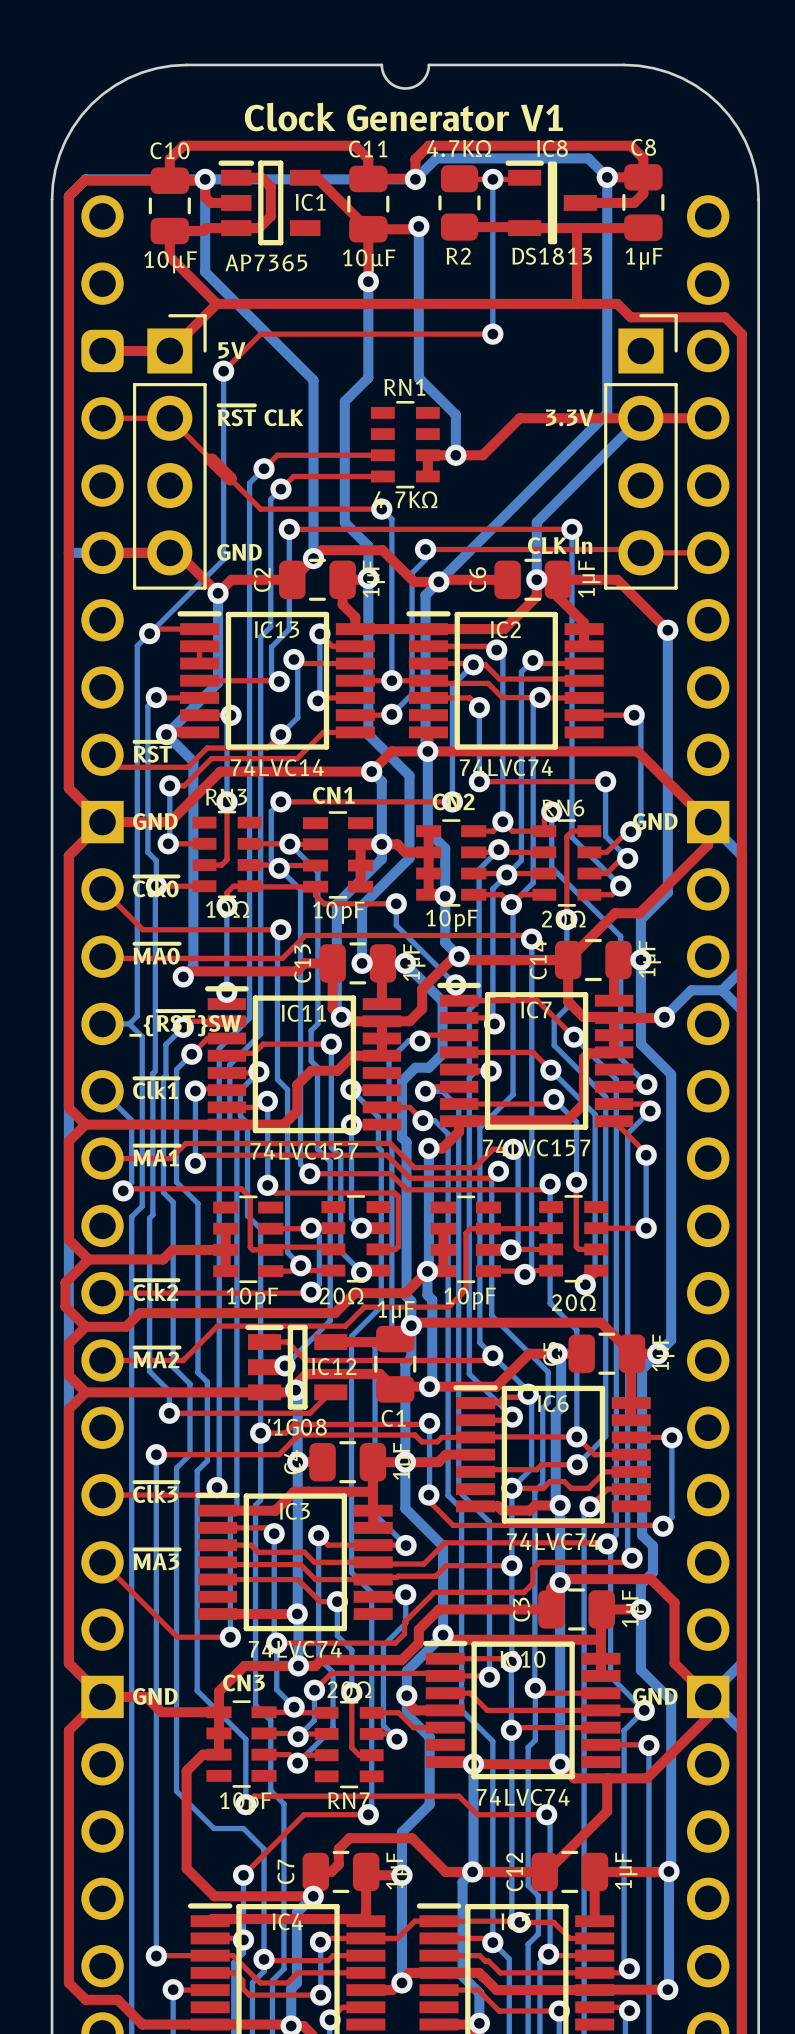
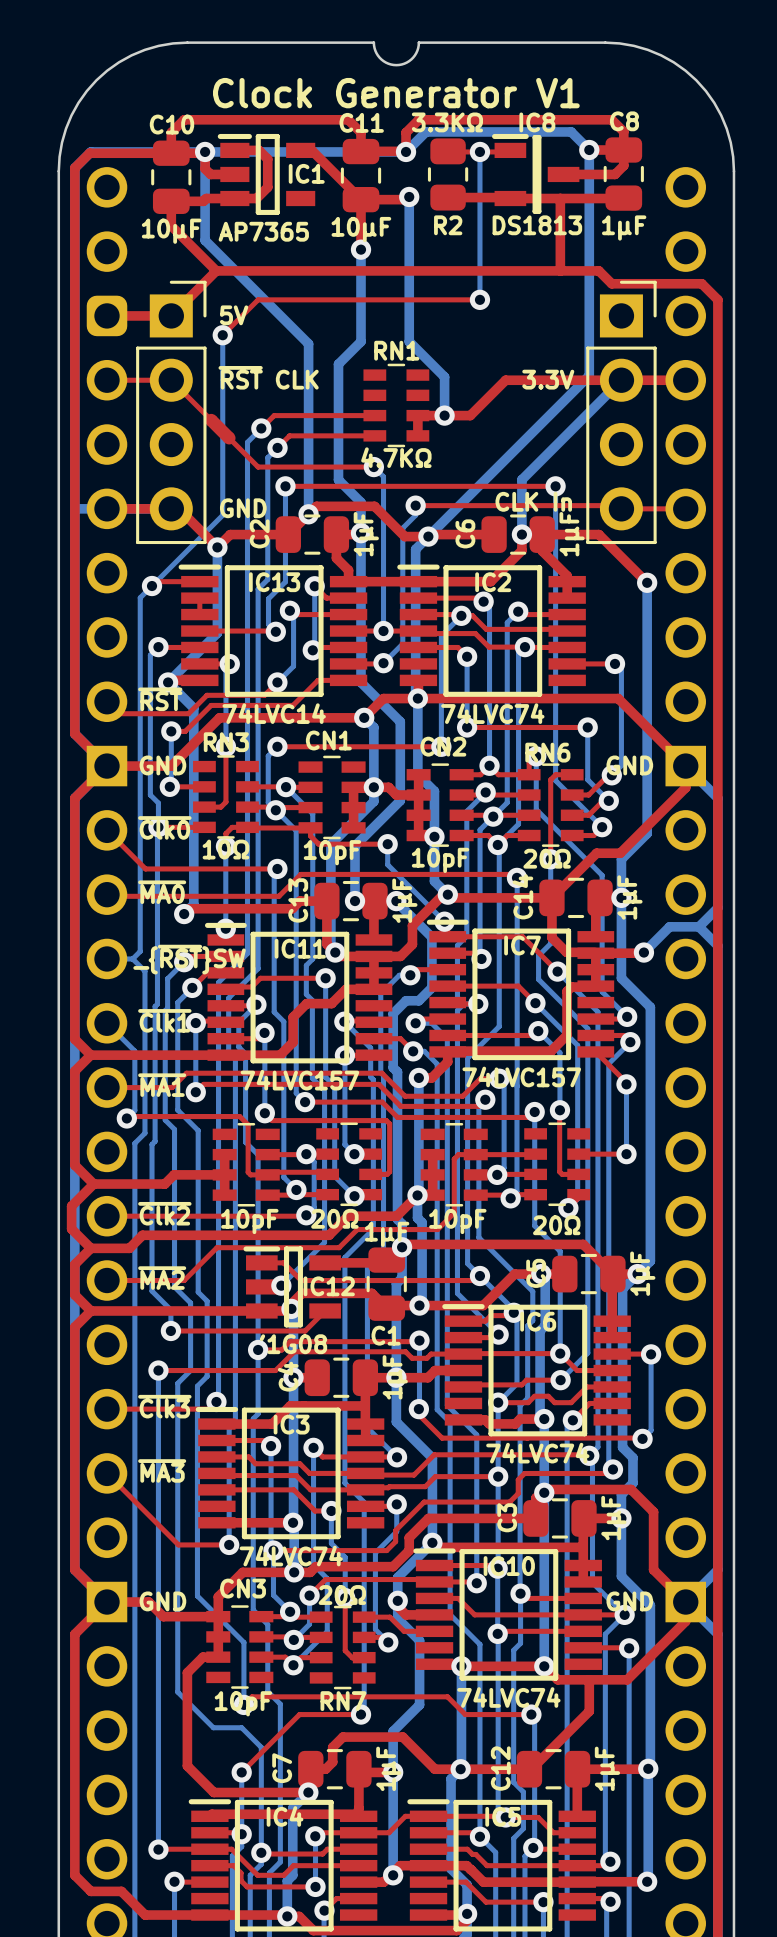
R2 value: 4.7KΩ (459, 148) -> 3.3KΩ (447, 122)

